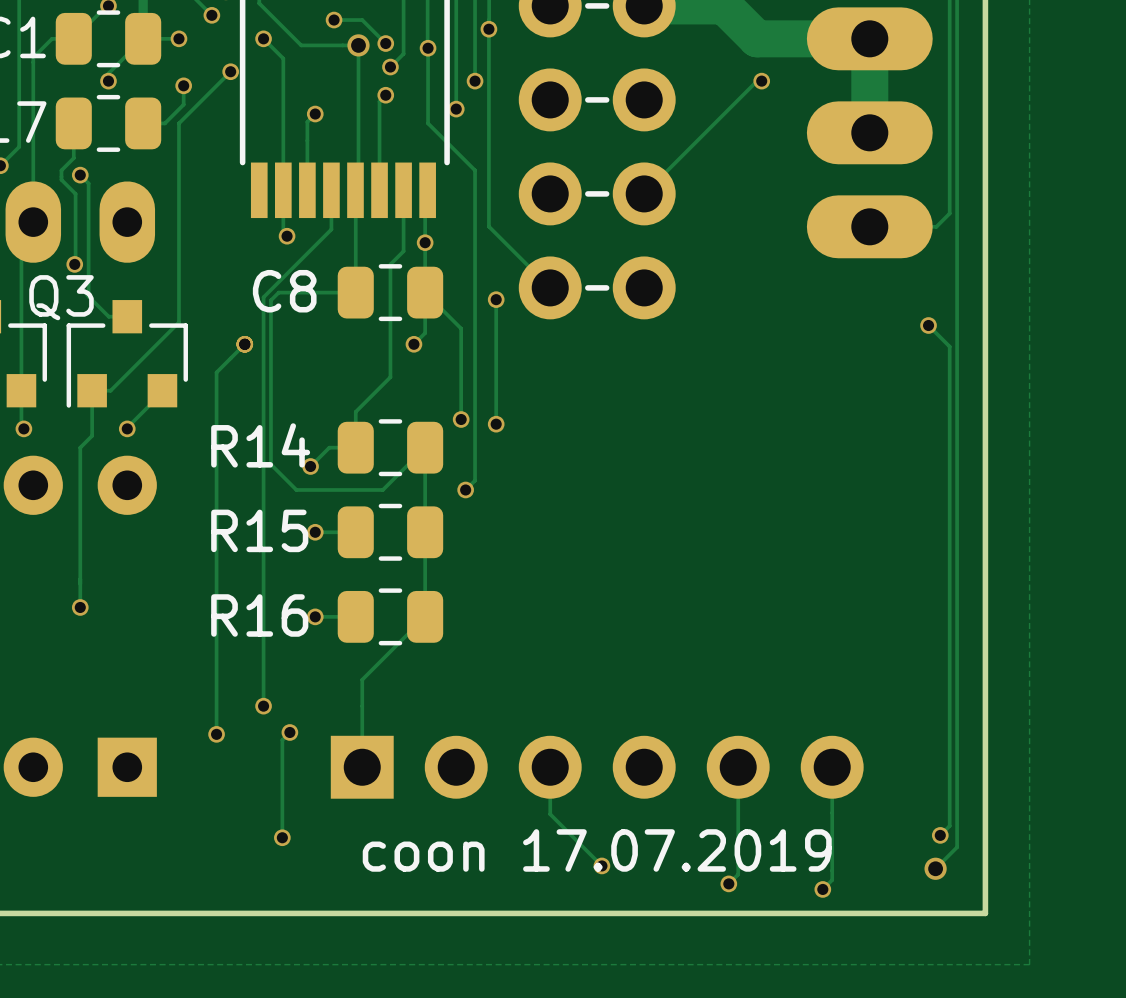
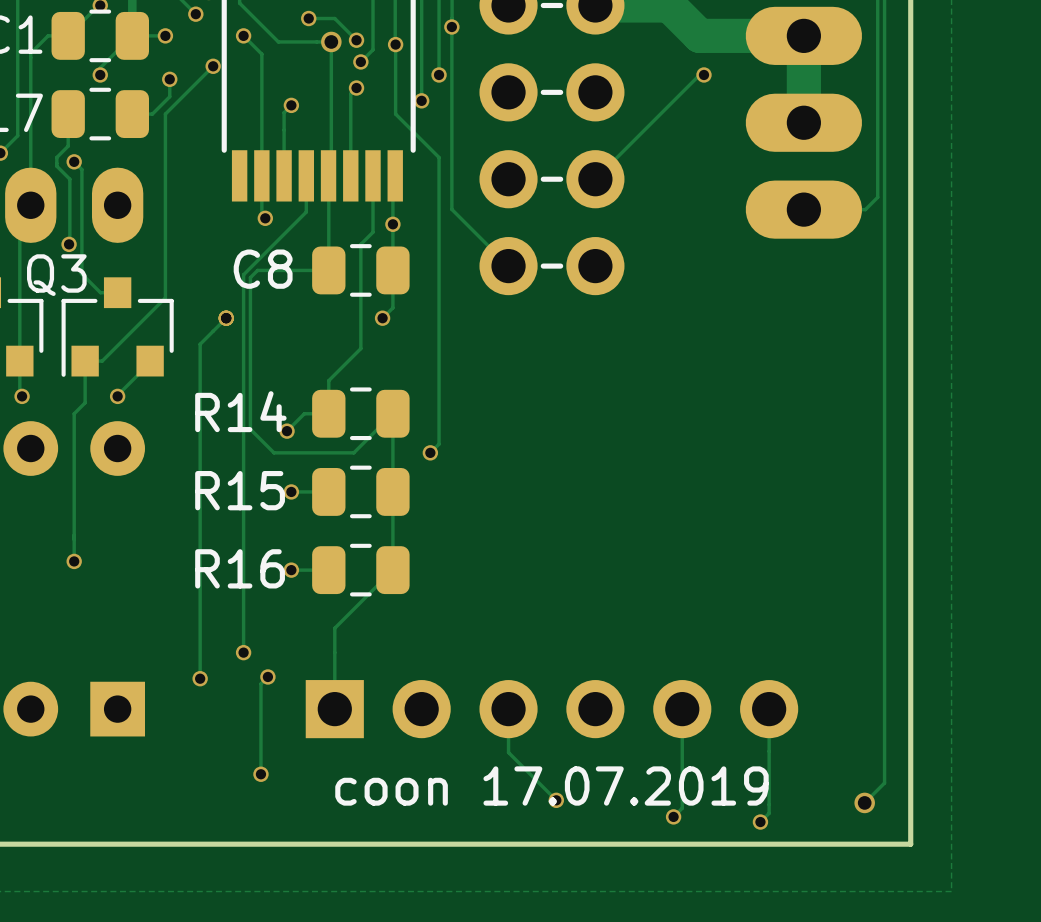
track: (425, 292) (461, 328) (461, 419) -> none
track: (496, 299) (496, 424) -> none
via: (496, 299) -> none
track: (928, 325) (949, 346) (949, 826) (940, 835) -> none
via: (928, 325) -> none
via: (461, 419) -> none
via: (496, 424) -> none
via: (940, 835) -> none

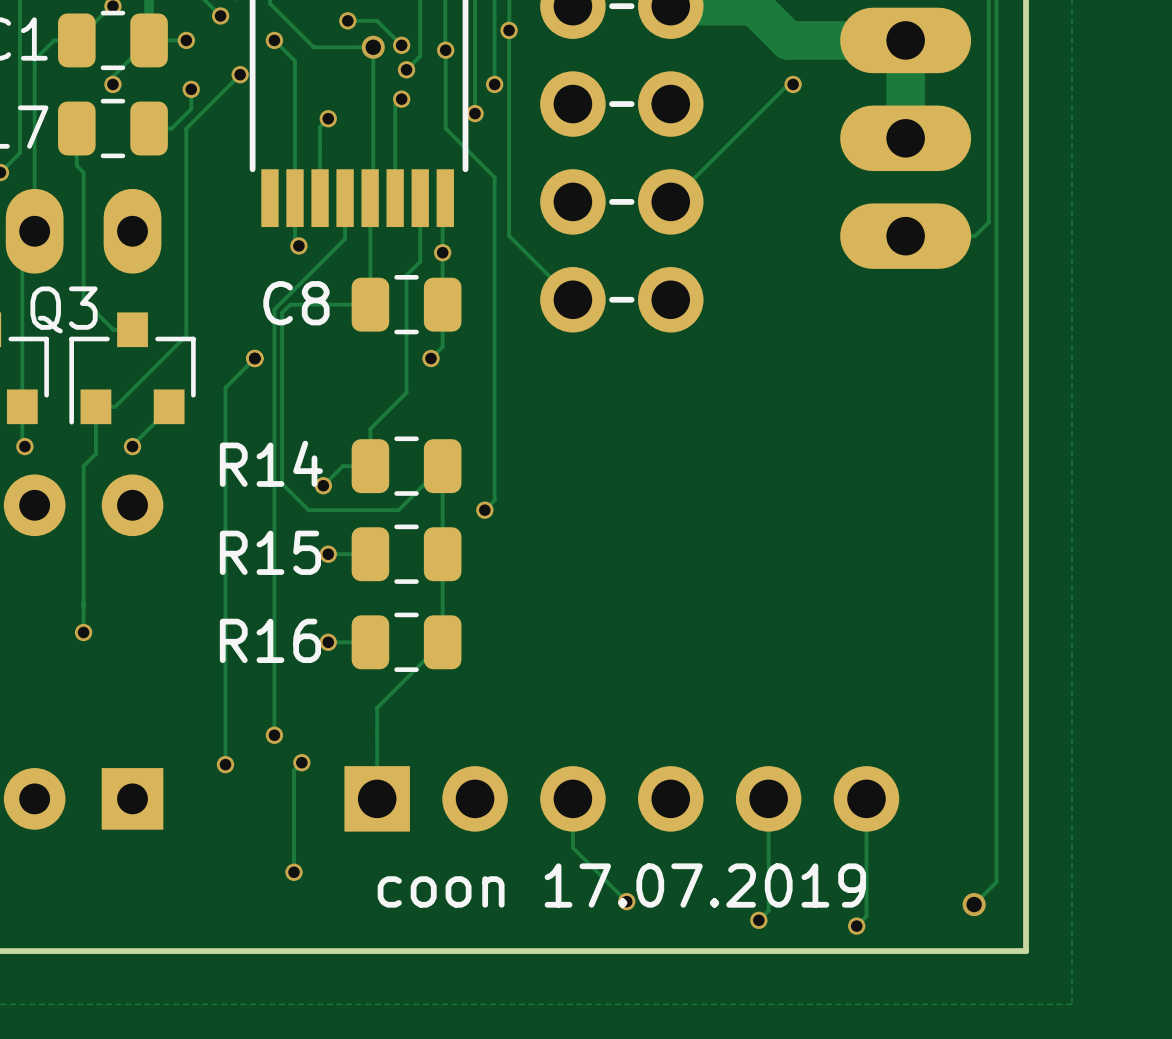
track: (68, 146) (56, 157) (56, 166) (69, 179) (69, 244) -> (76, 164) (83, 172) (83, 300) (90, 307)
track: (74, 161) (81, 169) (81, 274) -> none
via: (74, 161) -> none
via: (69, 244) -> none

